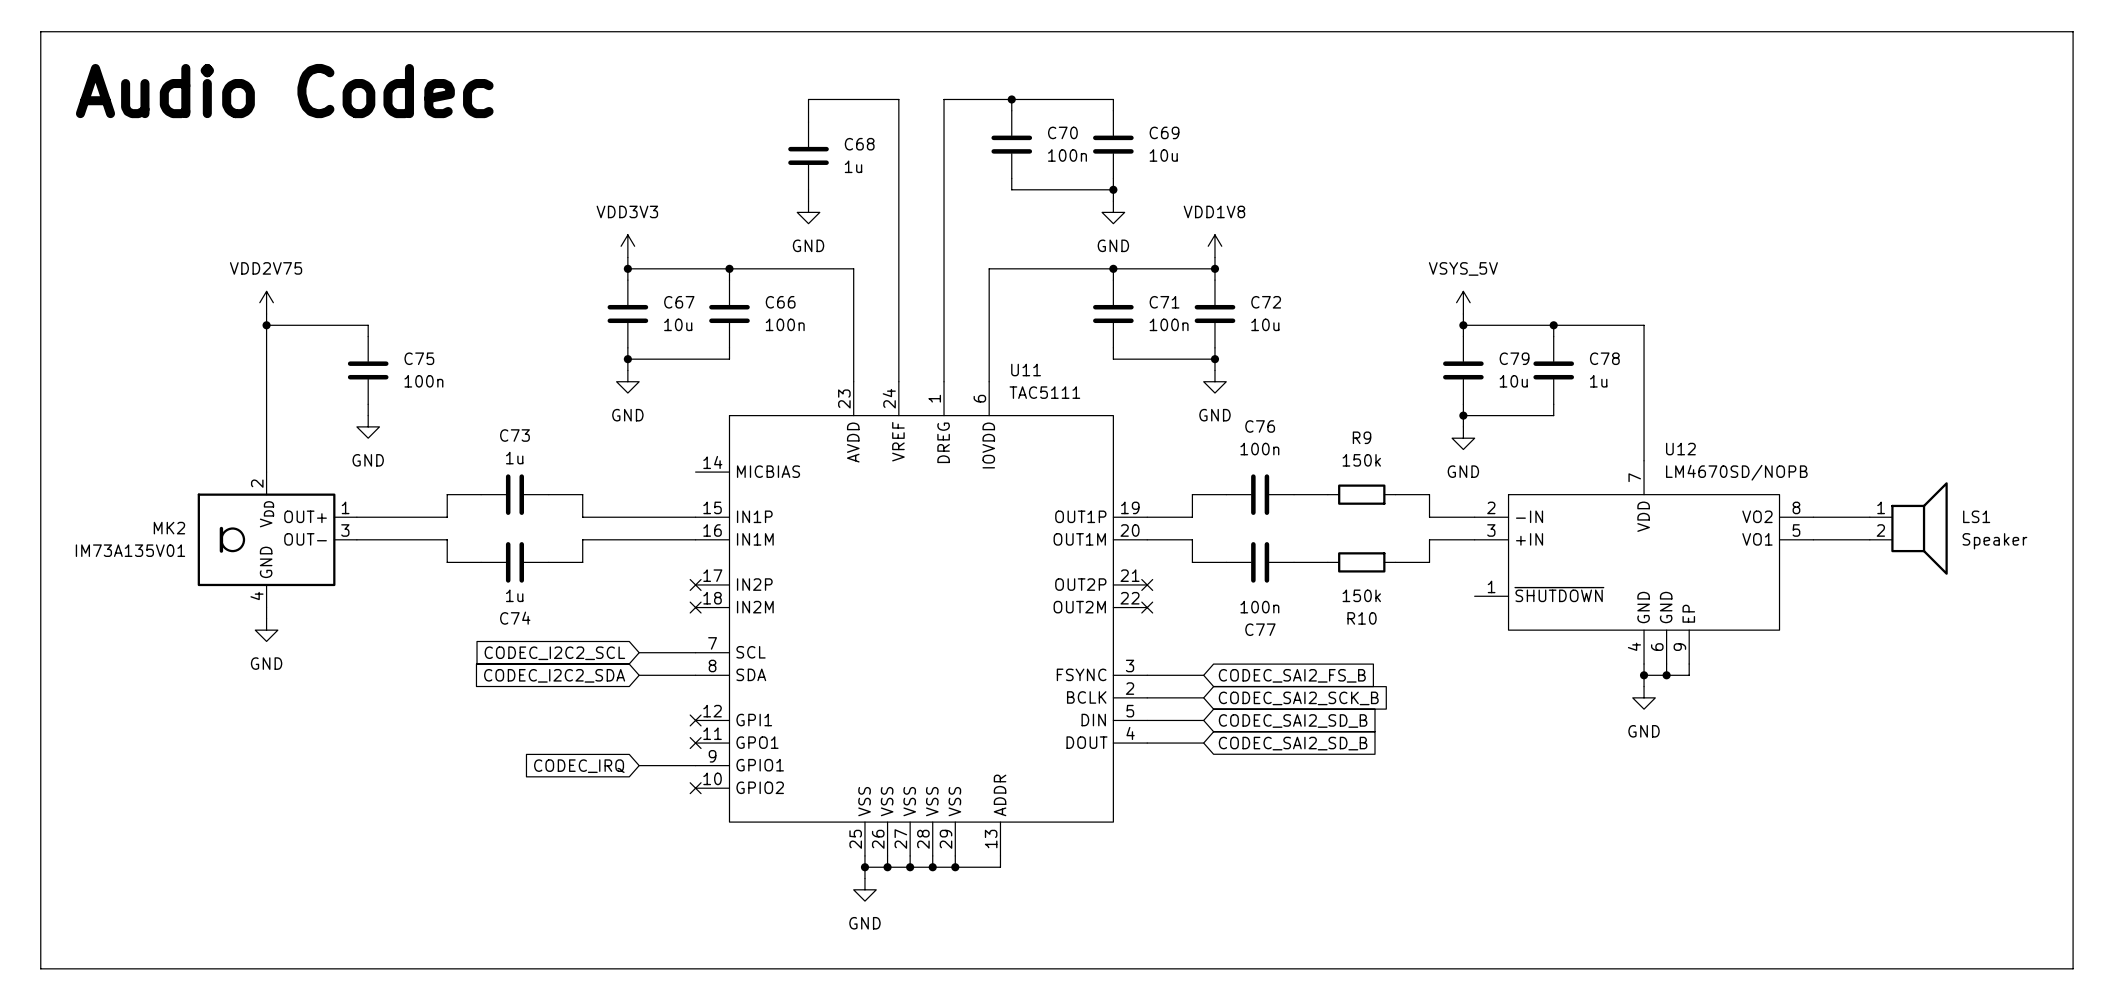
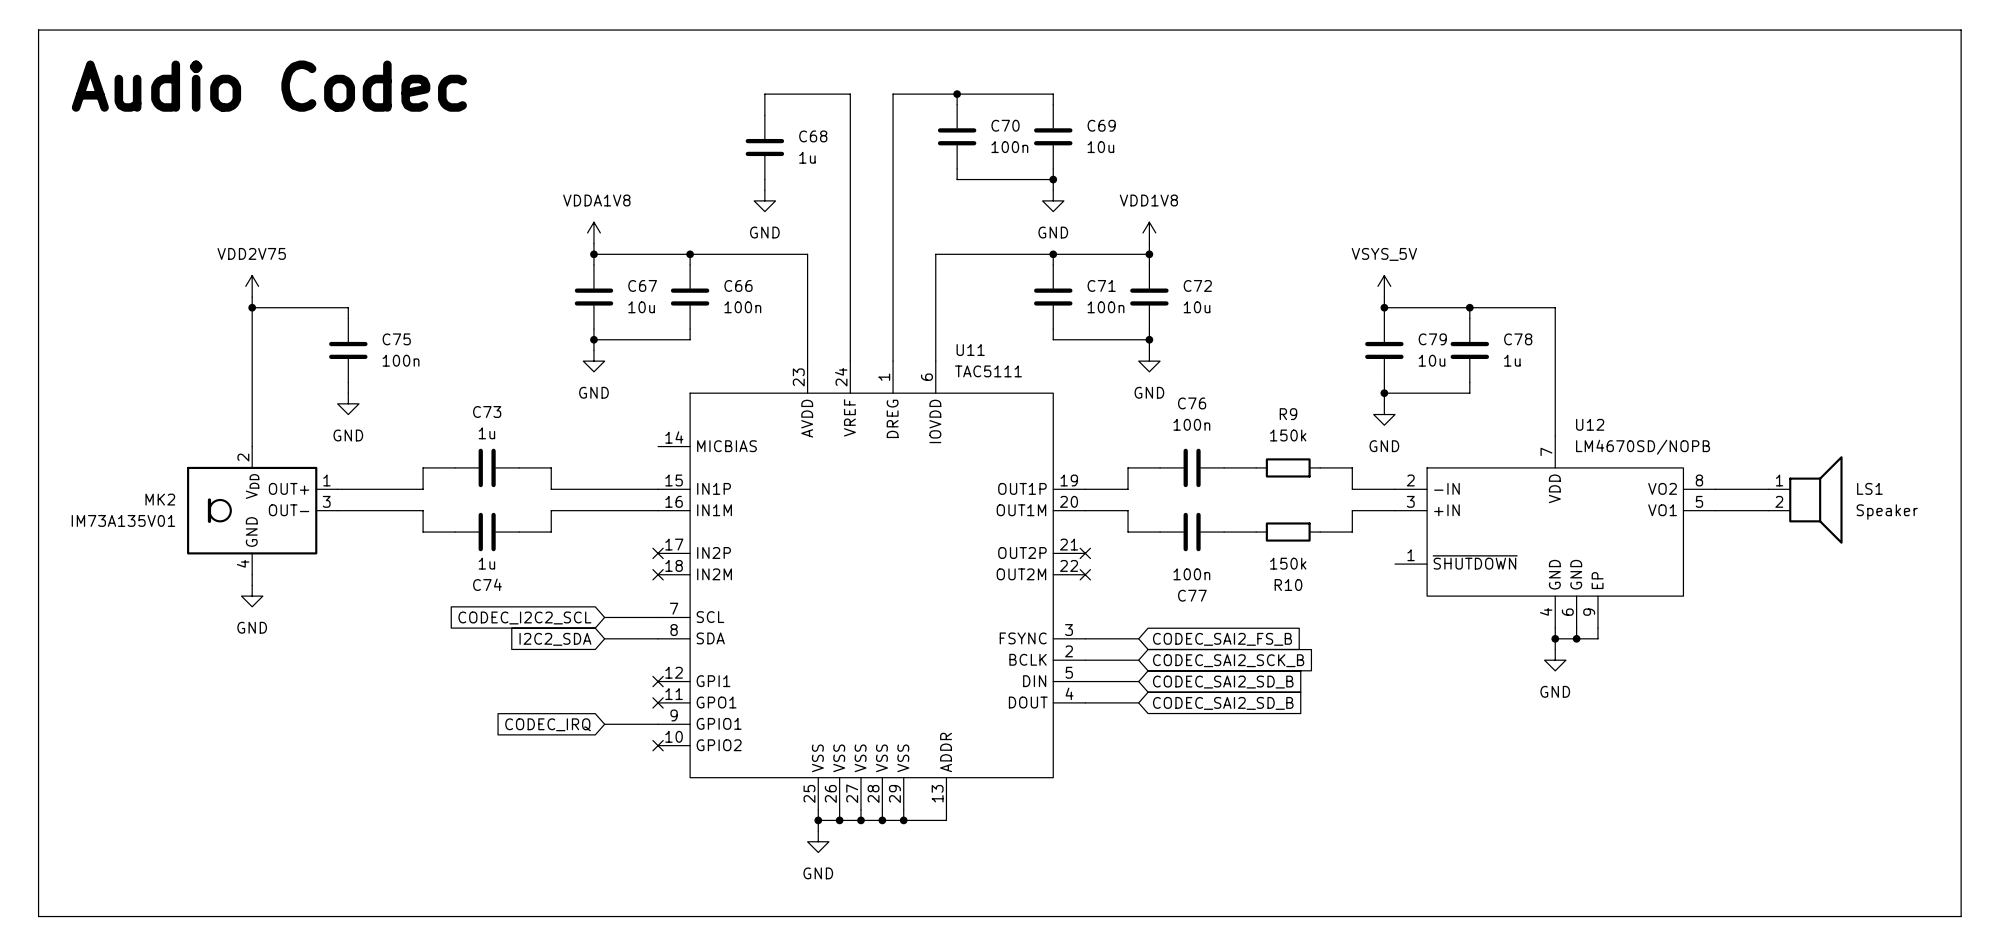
power symbol: VDD3V3 (627, 246) -> VDDA1V8 (593, 232)
global label: CODEC_I2C2_SDA (554, 675) -> I2C2_SDA (555, 639)

